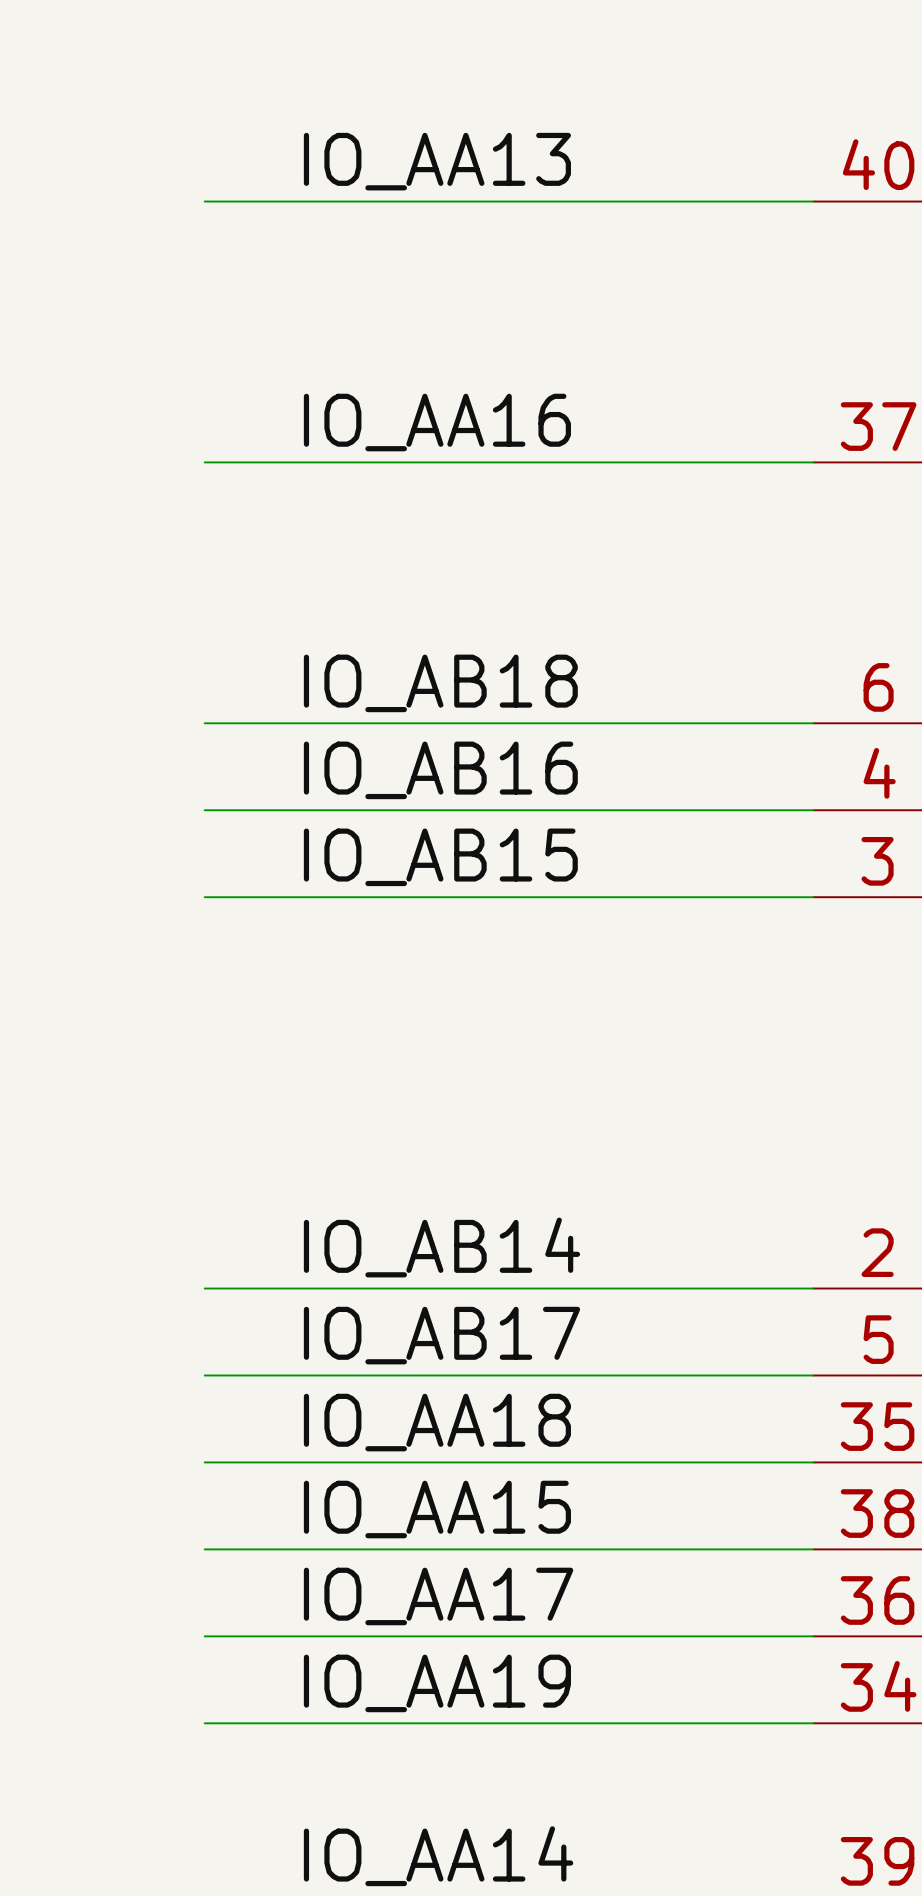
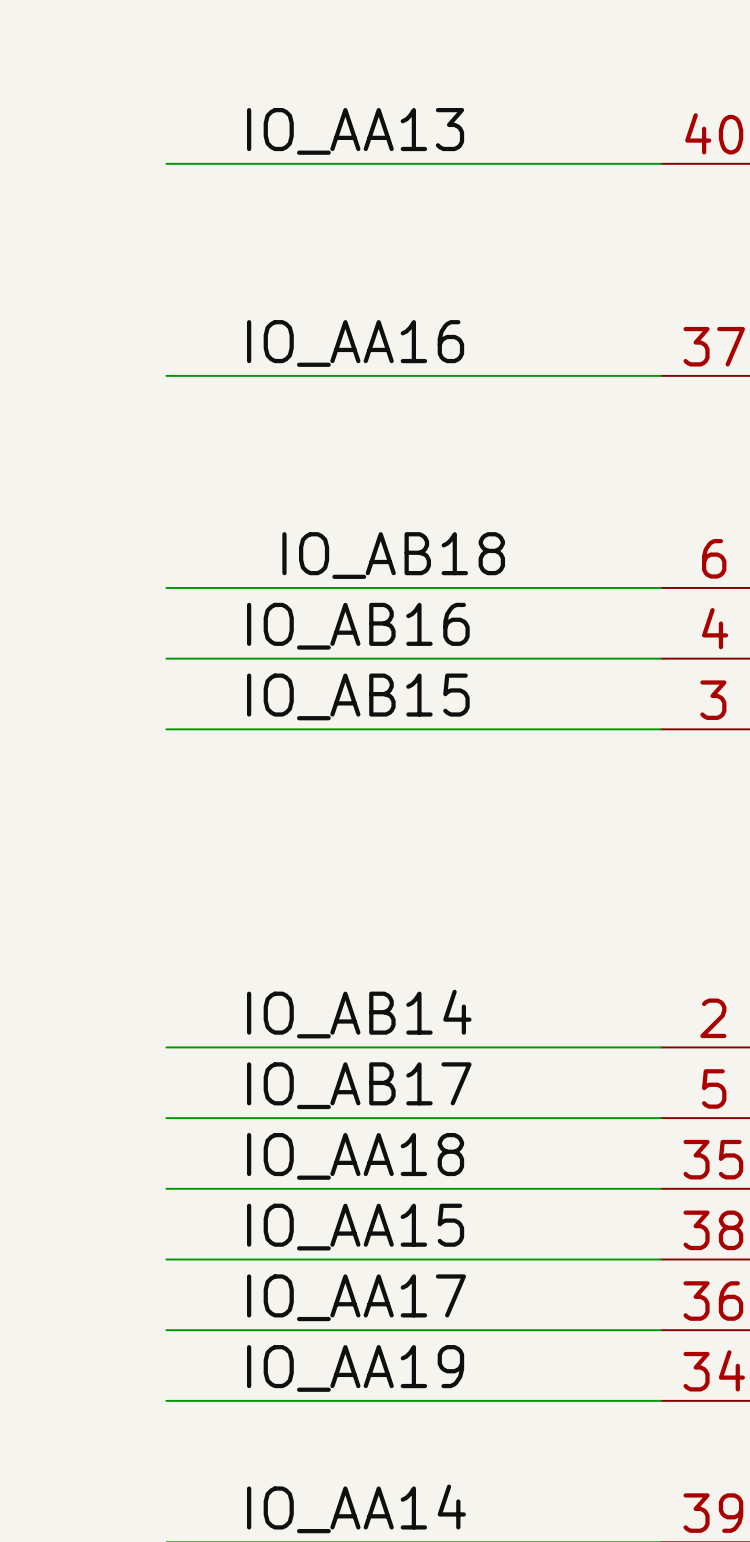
label position: IO_AB18 (440, 683) -> IO_AB18 (393, 555)

